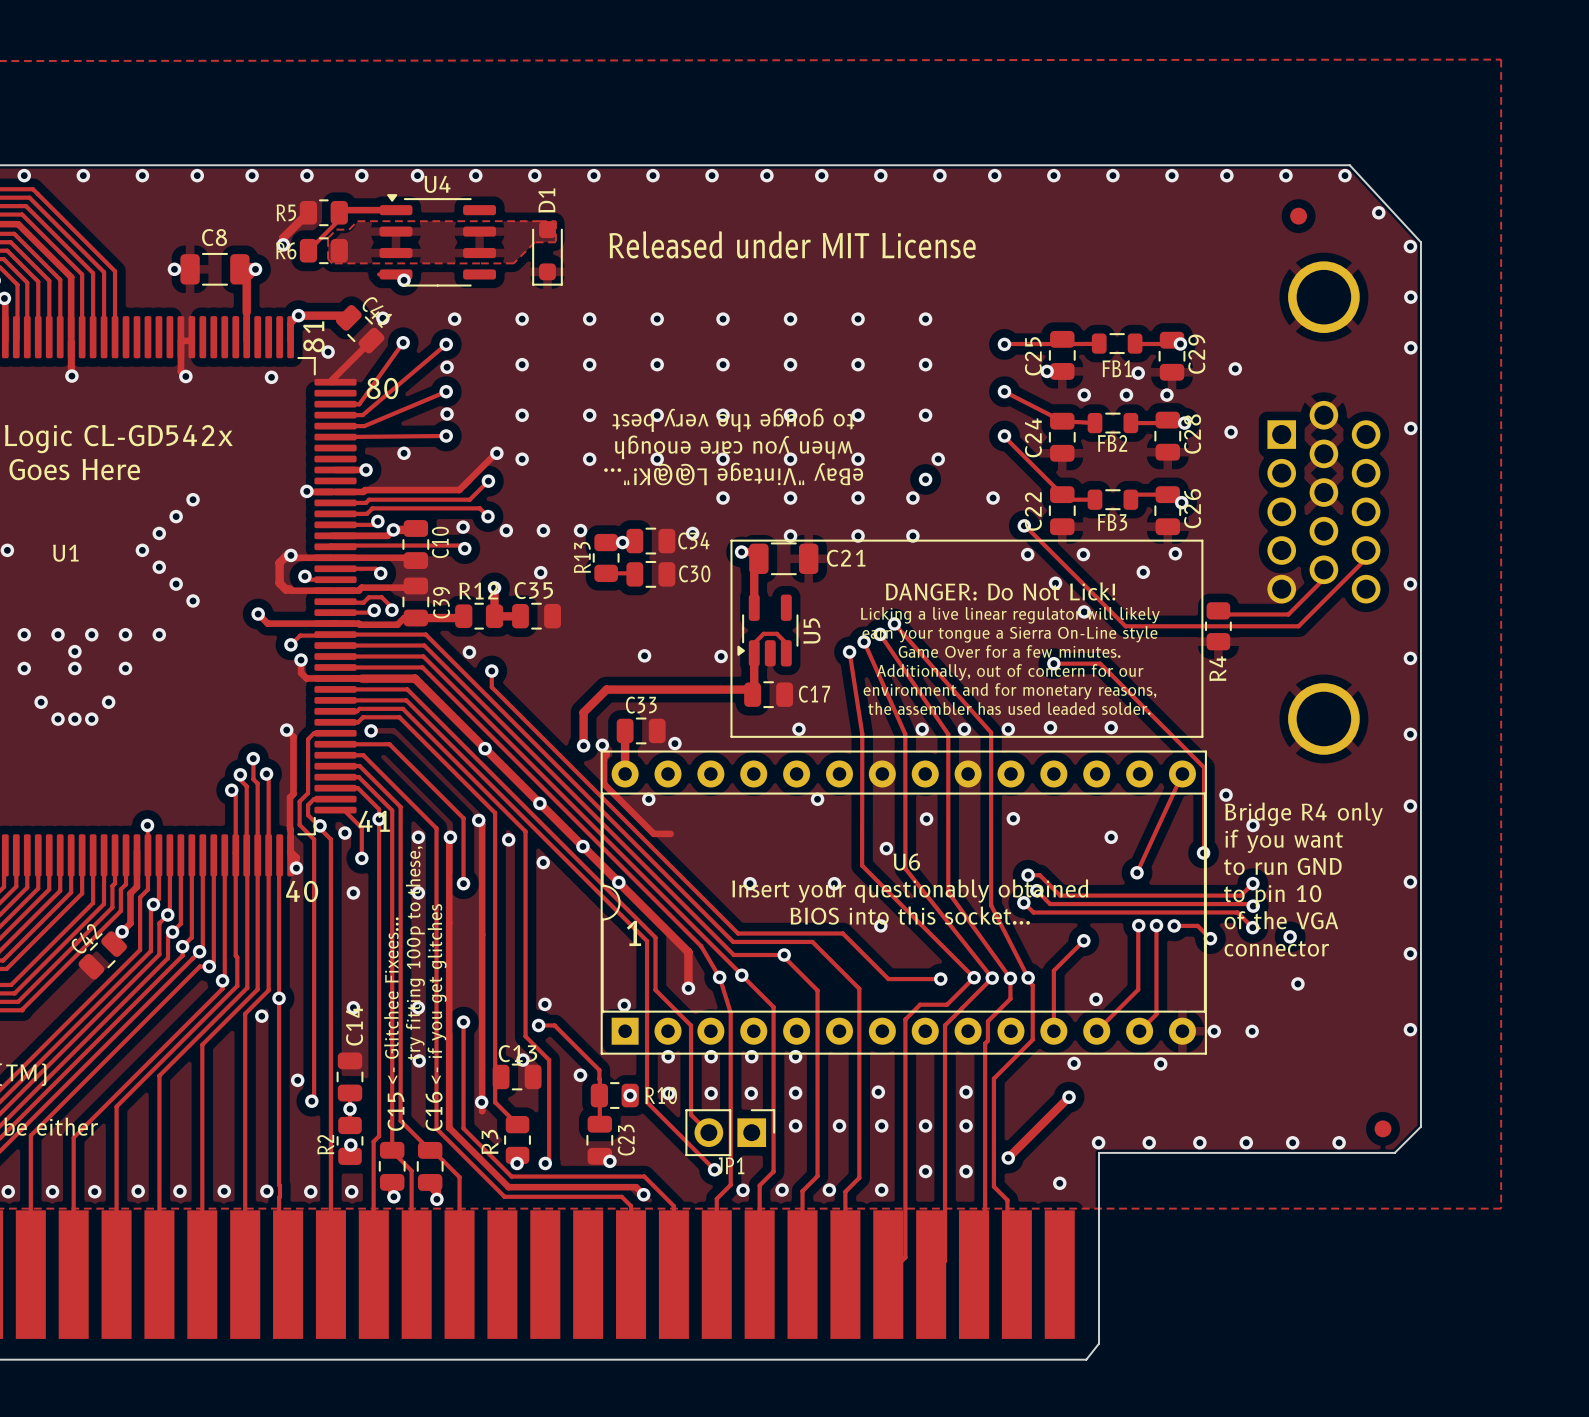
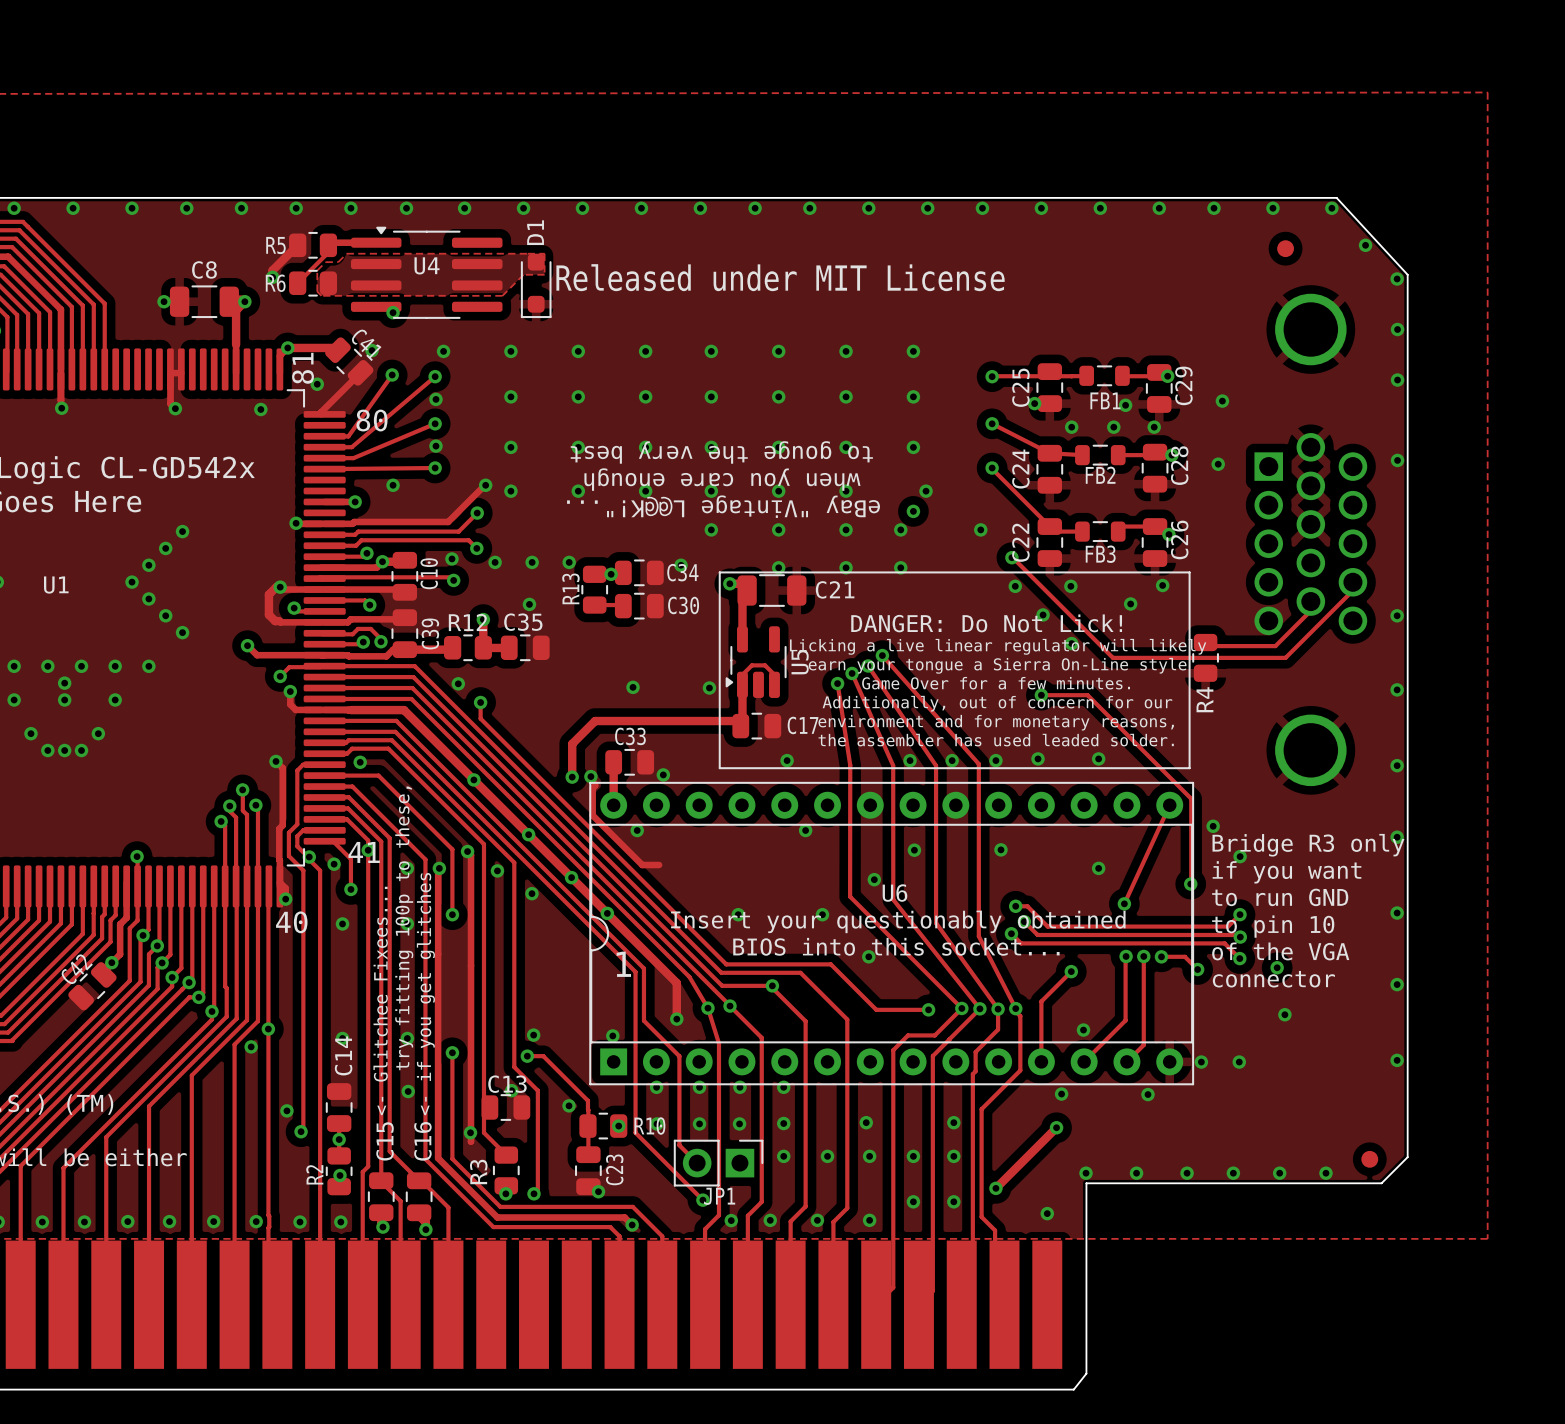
U4 name position: U4 (437, 184) -> U4 (427, 265)
U4 footprint: [379, 194, 497, 287] -> [350, 226, 503, 319]
text: Bridge R4 only (1304, 814) -> Bridge R3 only (1308, 845)

